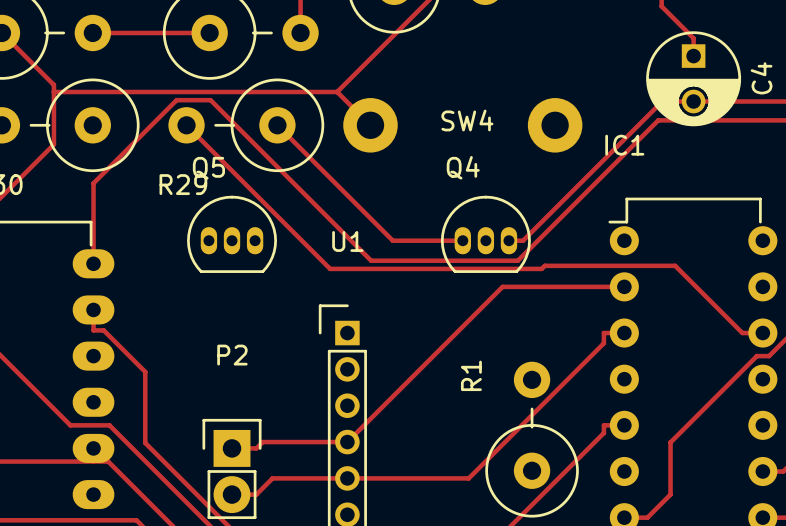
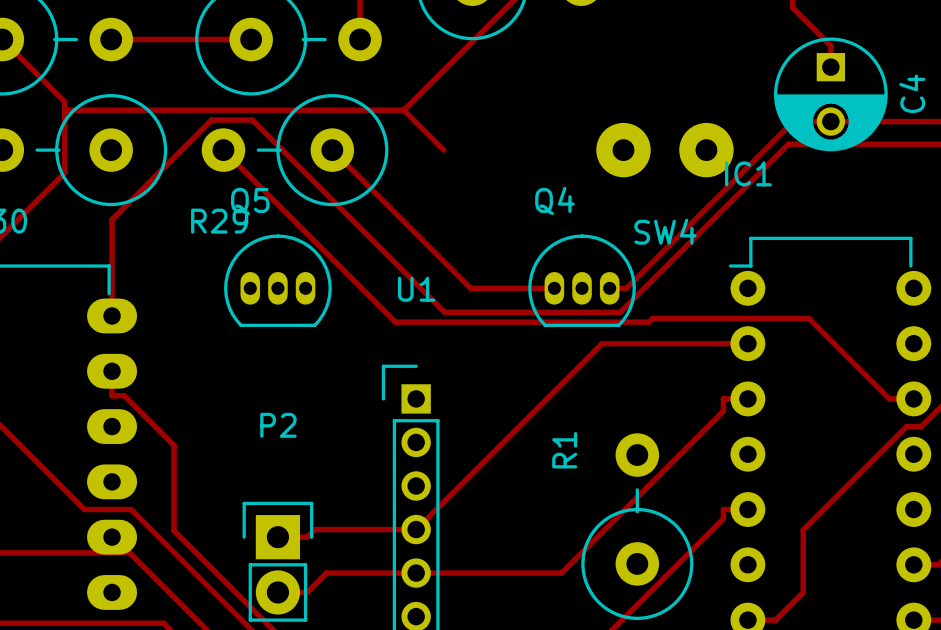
SW4 footprint: [343, 98, 583, 153] -> [596, 122, 734, 178]
SW4 name position: SW4 (467, 120) -> SW4 (665, 231)

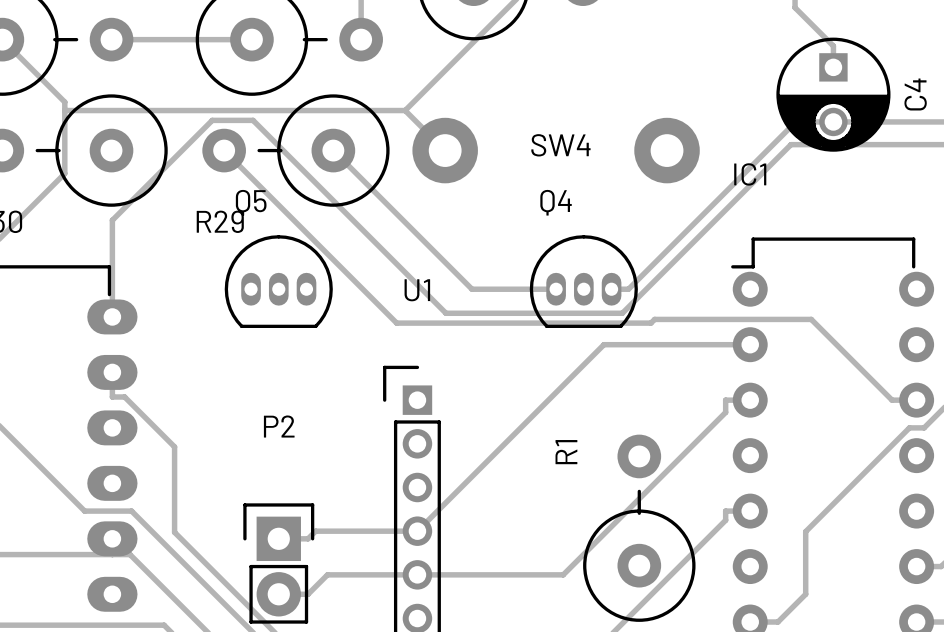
SW4 footprint: [596, 122, 734, 178] -> [412, 117, 700, 184]
SW4 name position: SW4 (665, 231) -> SW4 (560, 145)

